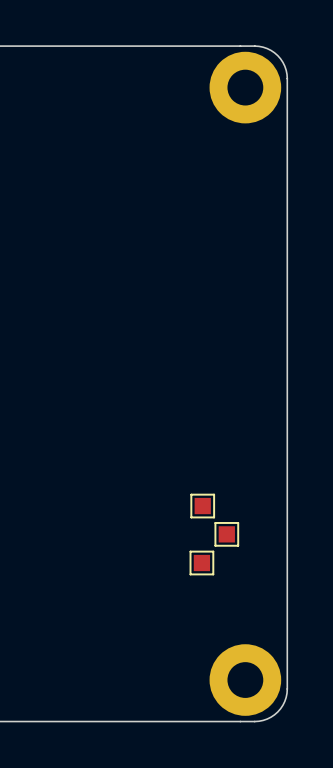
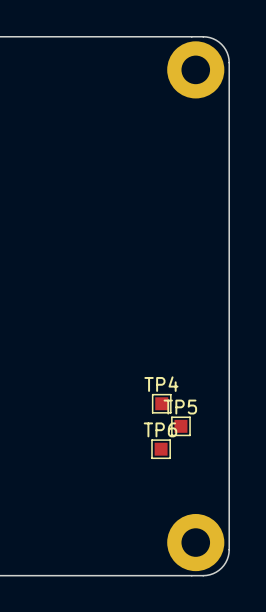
TP4 name: none -> TP4 (161, 384)
TP5 name: none -> TP5 (180, 407)
TP6 name: none -> TP6 (160, 429)

